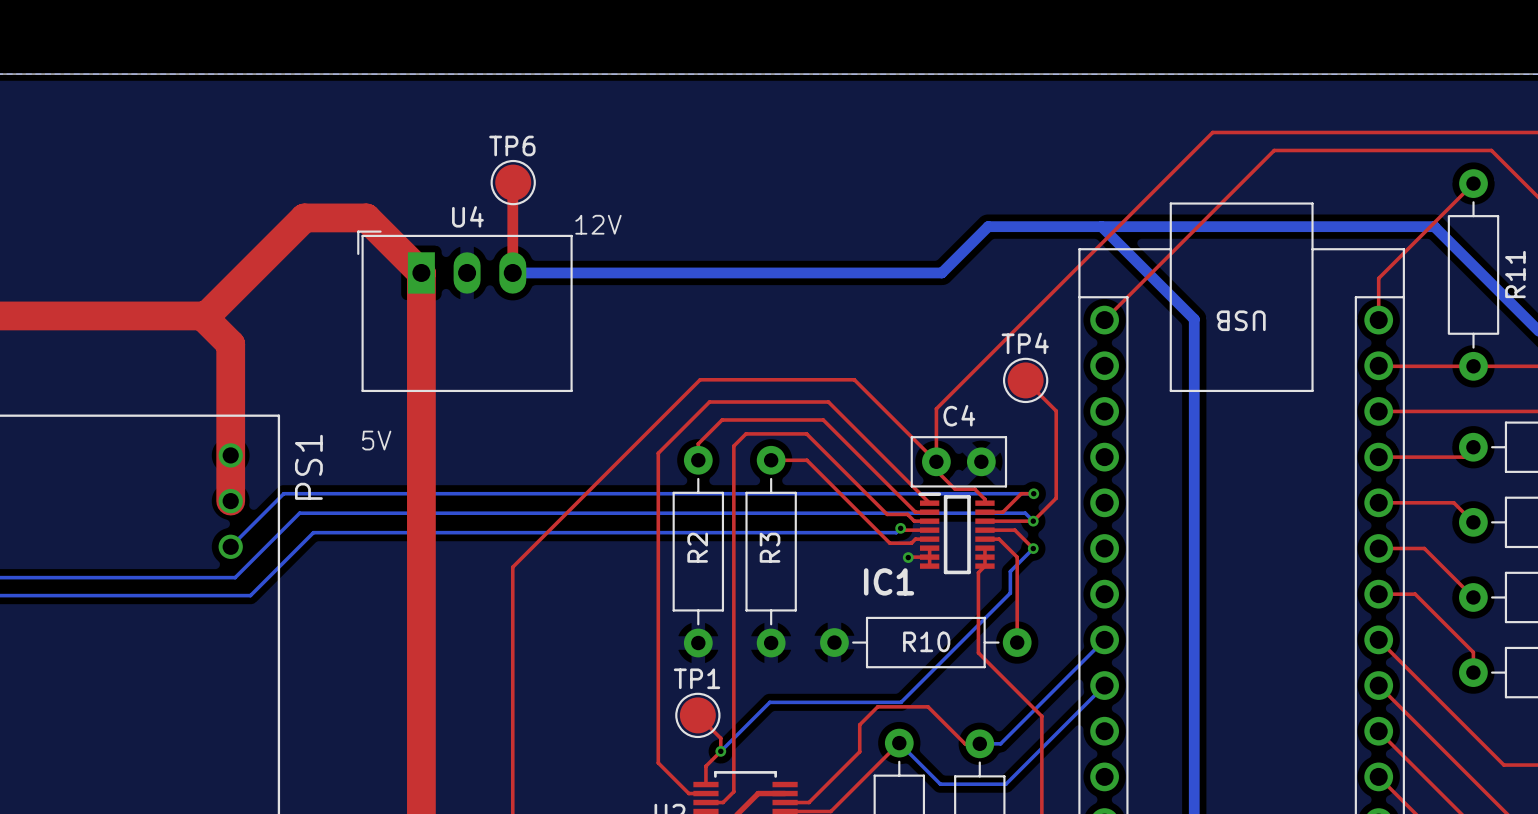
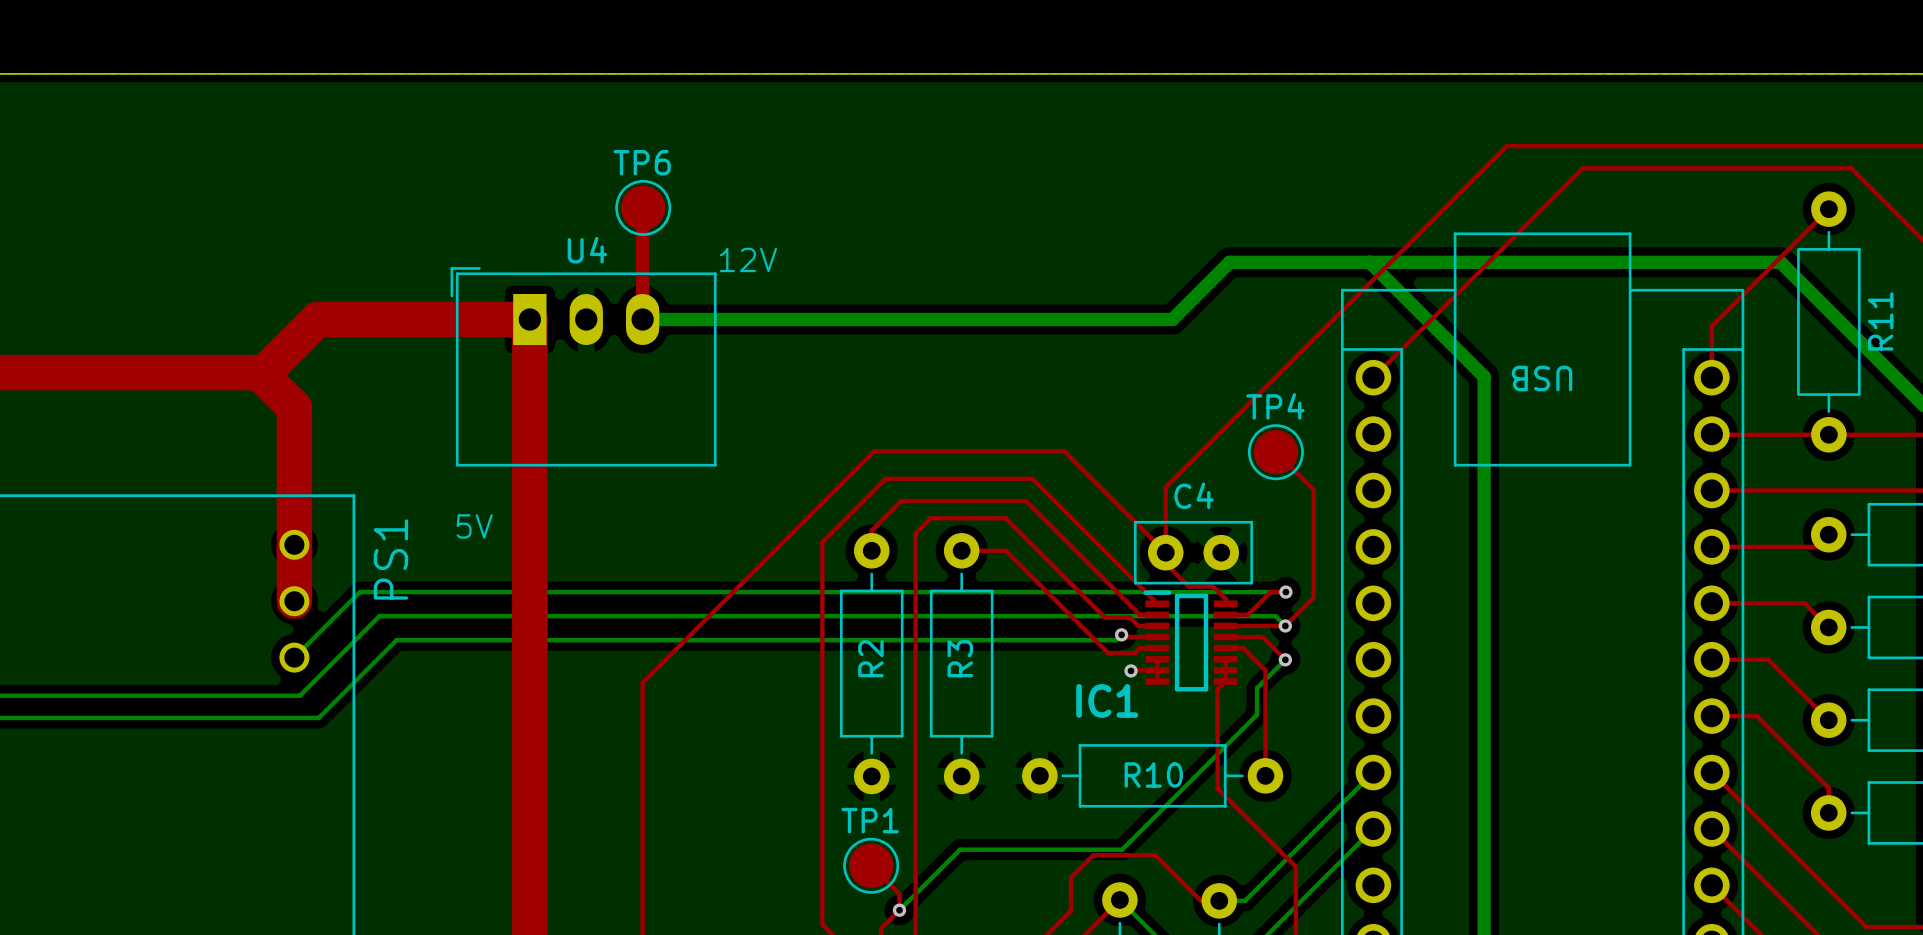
top track: (249, 272) (304, 217) (366, 217) (421, 272) -> (317, 319) (529, 319)

